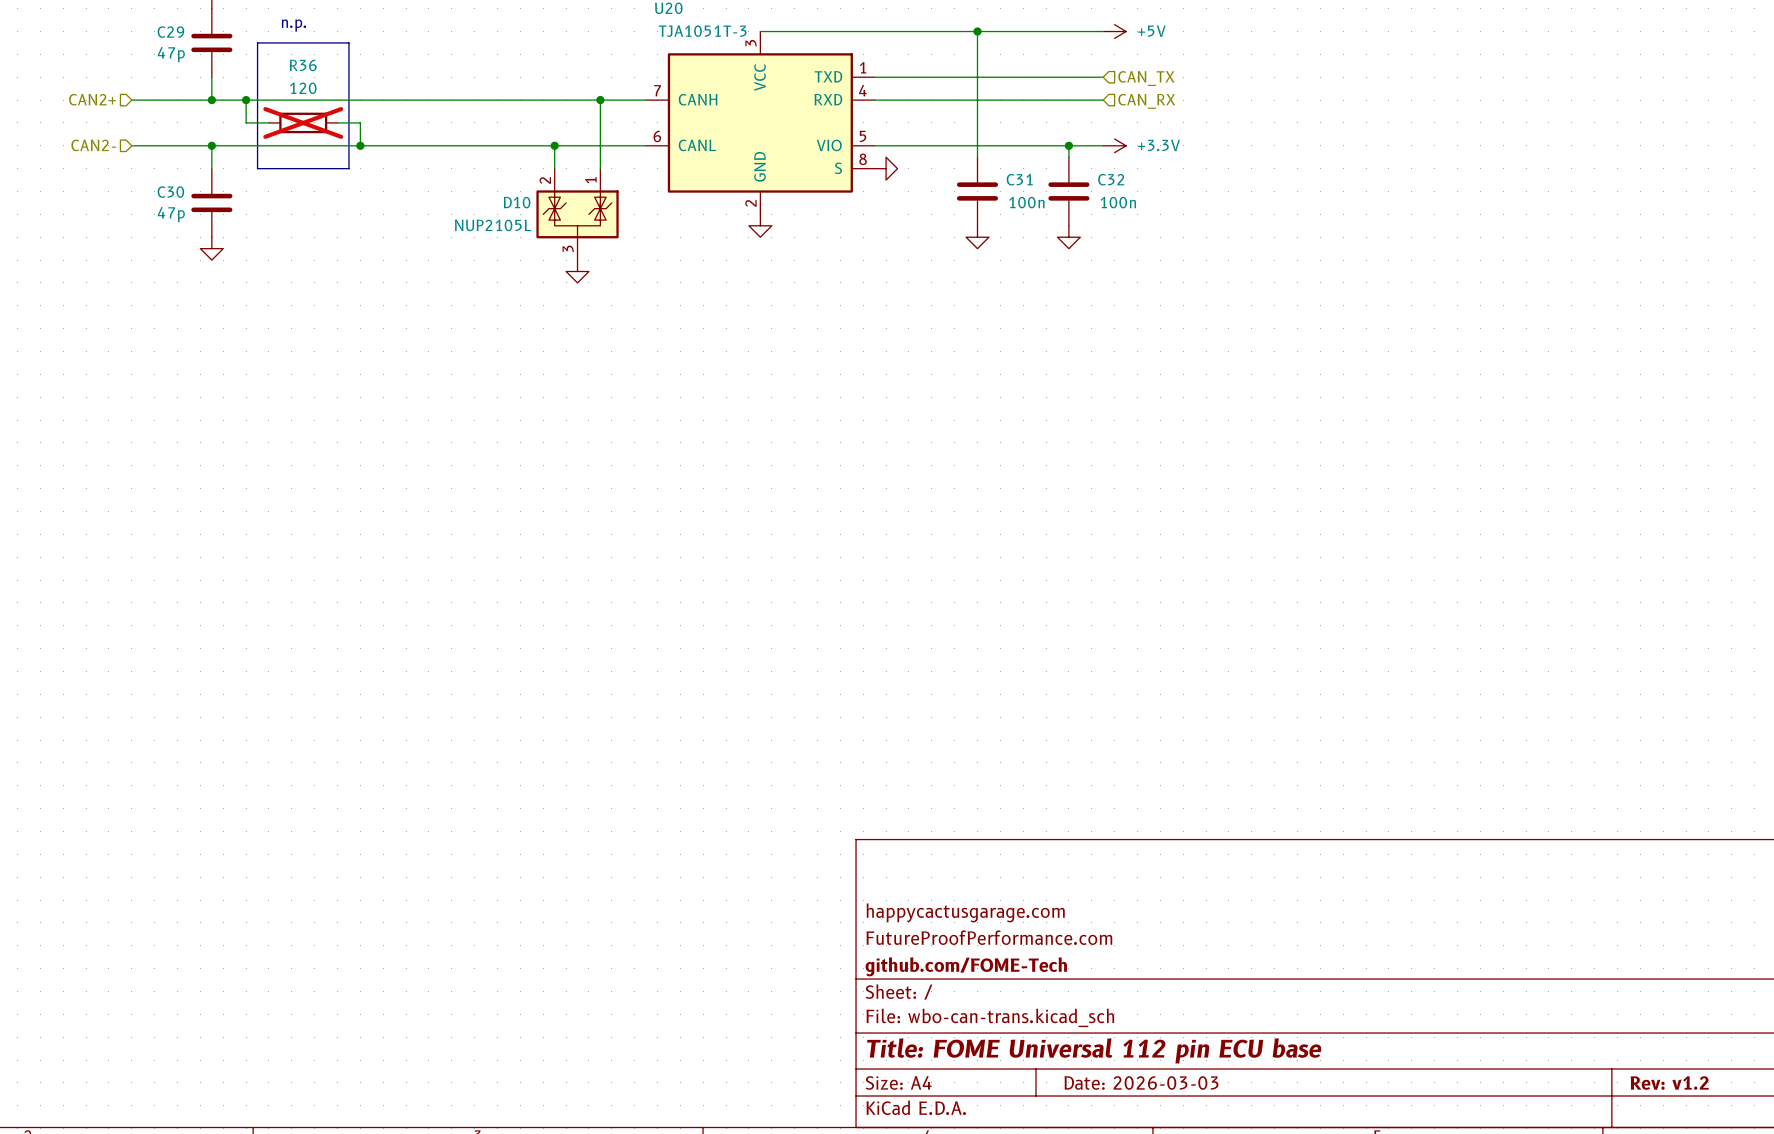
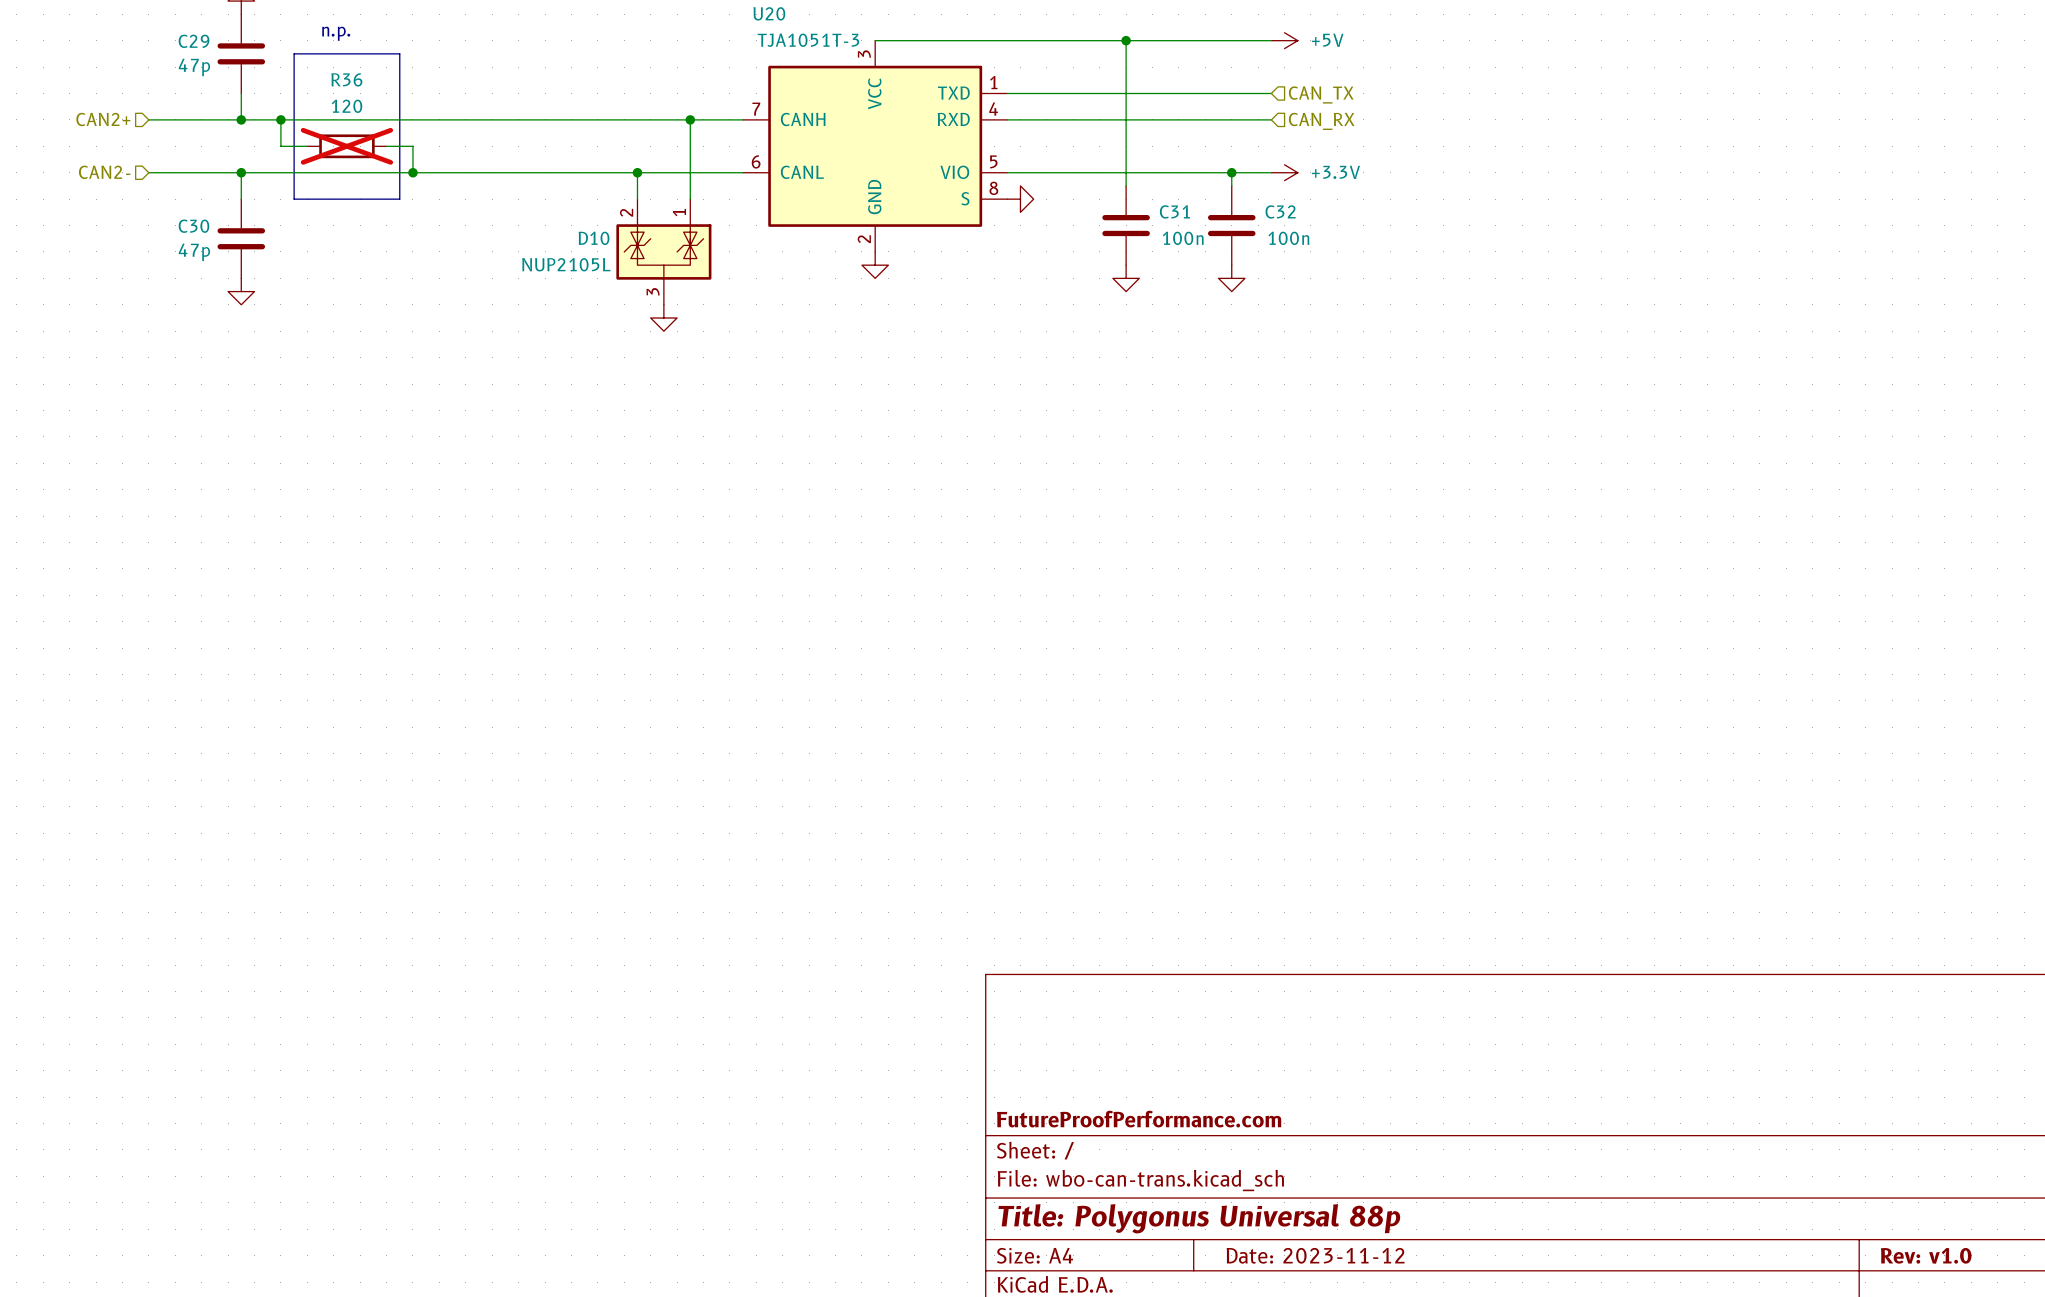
title block: happycactusgarage.com (965, 912) -> none
title block: FutureProofPerformance.com (989, 937) -> none
title block: github.com/FOME-Tech (966, 966) -> FutureProofPerformance.com (1139, 1119)
title block: Title: FOME Universal 112 pin ECU base (1094, 1050) -> Title: Polygonus Universal 88p (1199, 1218)
title block: Date: 2026-03-03 (1141, 1082) -> Date: 2023-11-12 (1315, 1255)
title block: Rev: v1.2 (1669, 1083) -> Rev: v1.0 (1926, 1255)

